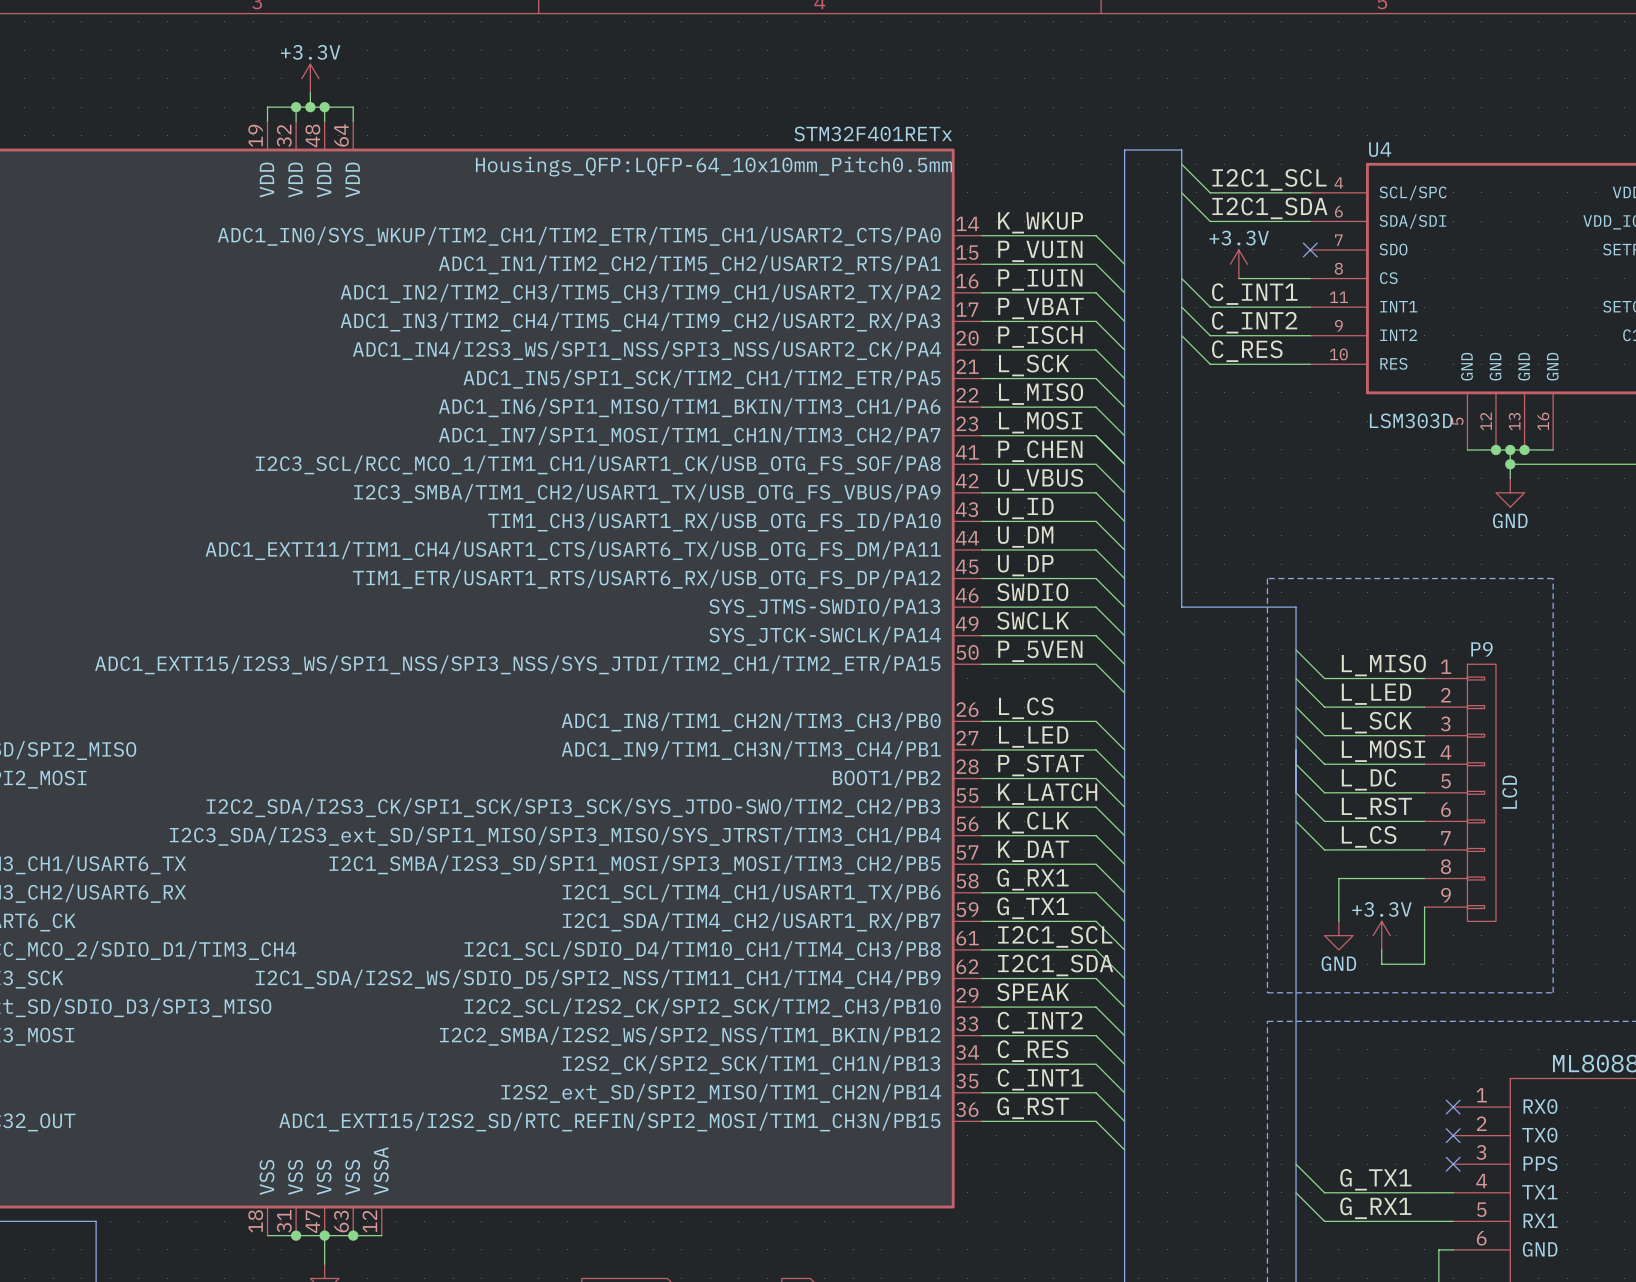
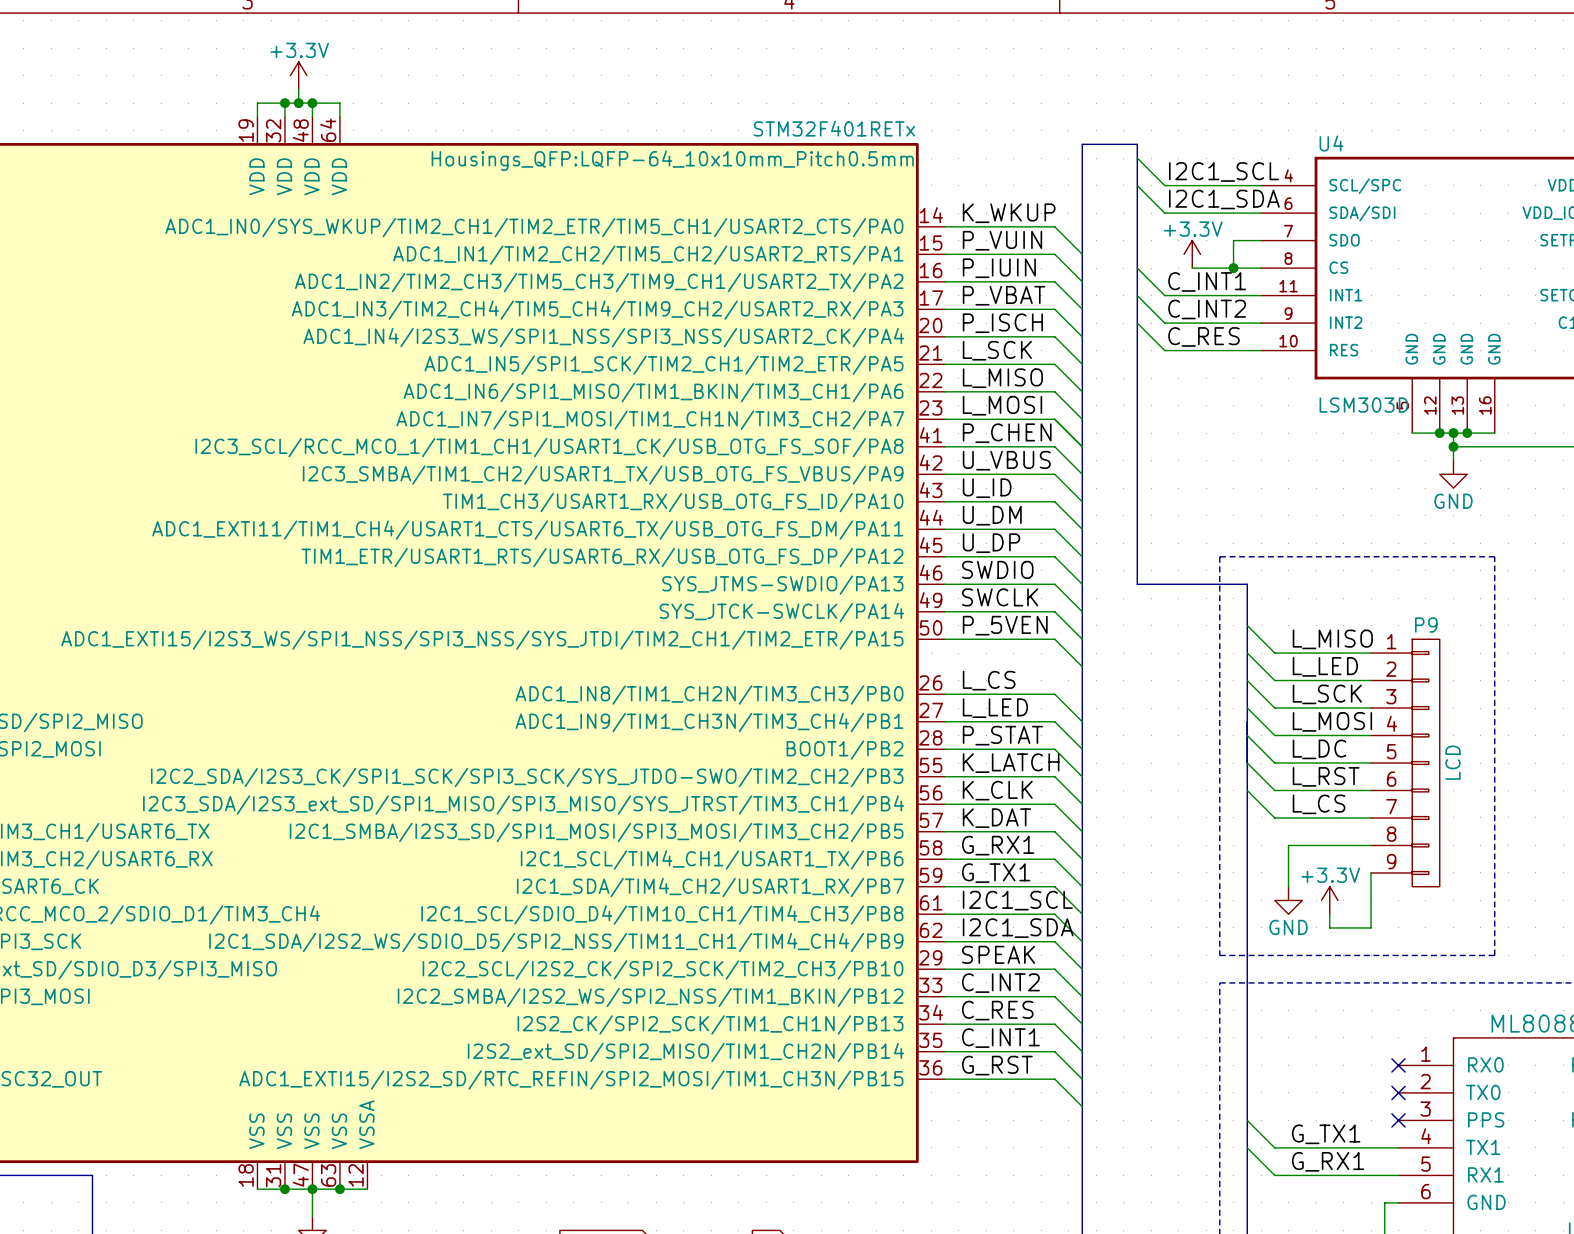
wire: none -> (1261, 240) (1233, 240) (1233, 268)
no-connect mark: (1310, 249) -> none
junction: none -> (1233, 268)

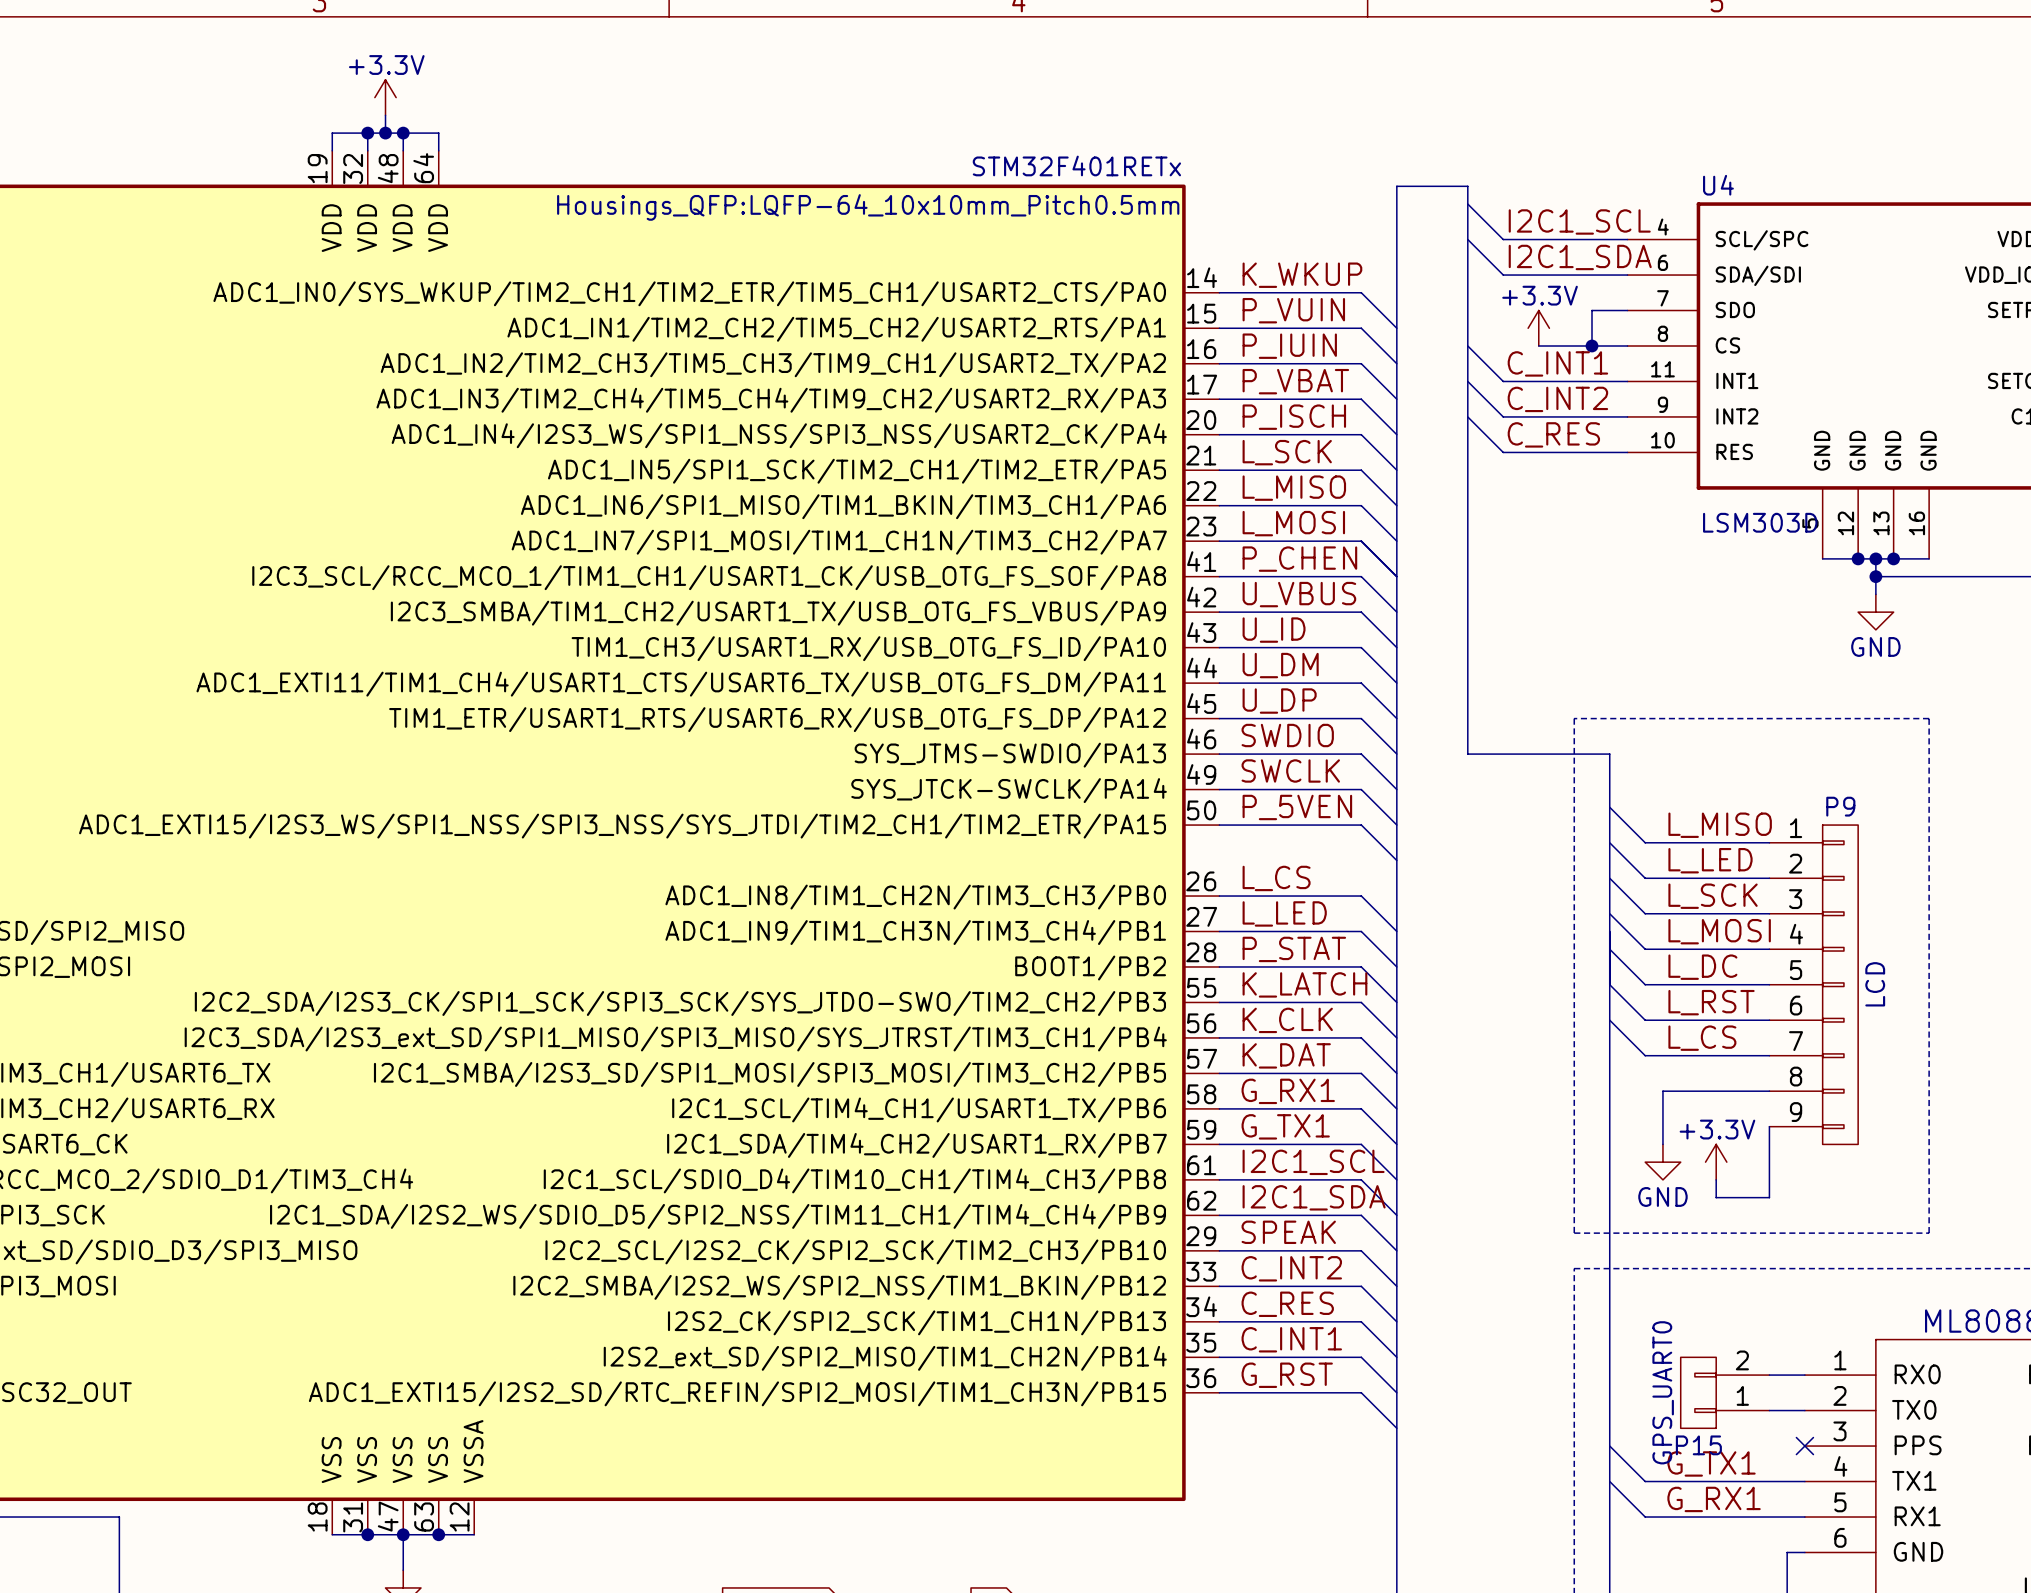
wire: none -> (1769, 1375) (1804, 1375)
no-connect mark: (1398, 1065) -> none
P15: none -> GPS_UART0 (1725, 1392)
wire: none -> (1769, 1410) (1804, 1410)
no-connect mark: (1398, 1092) -> none

